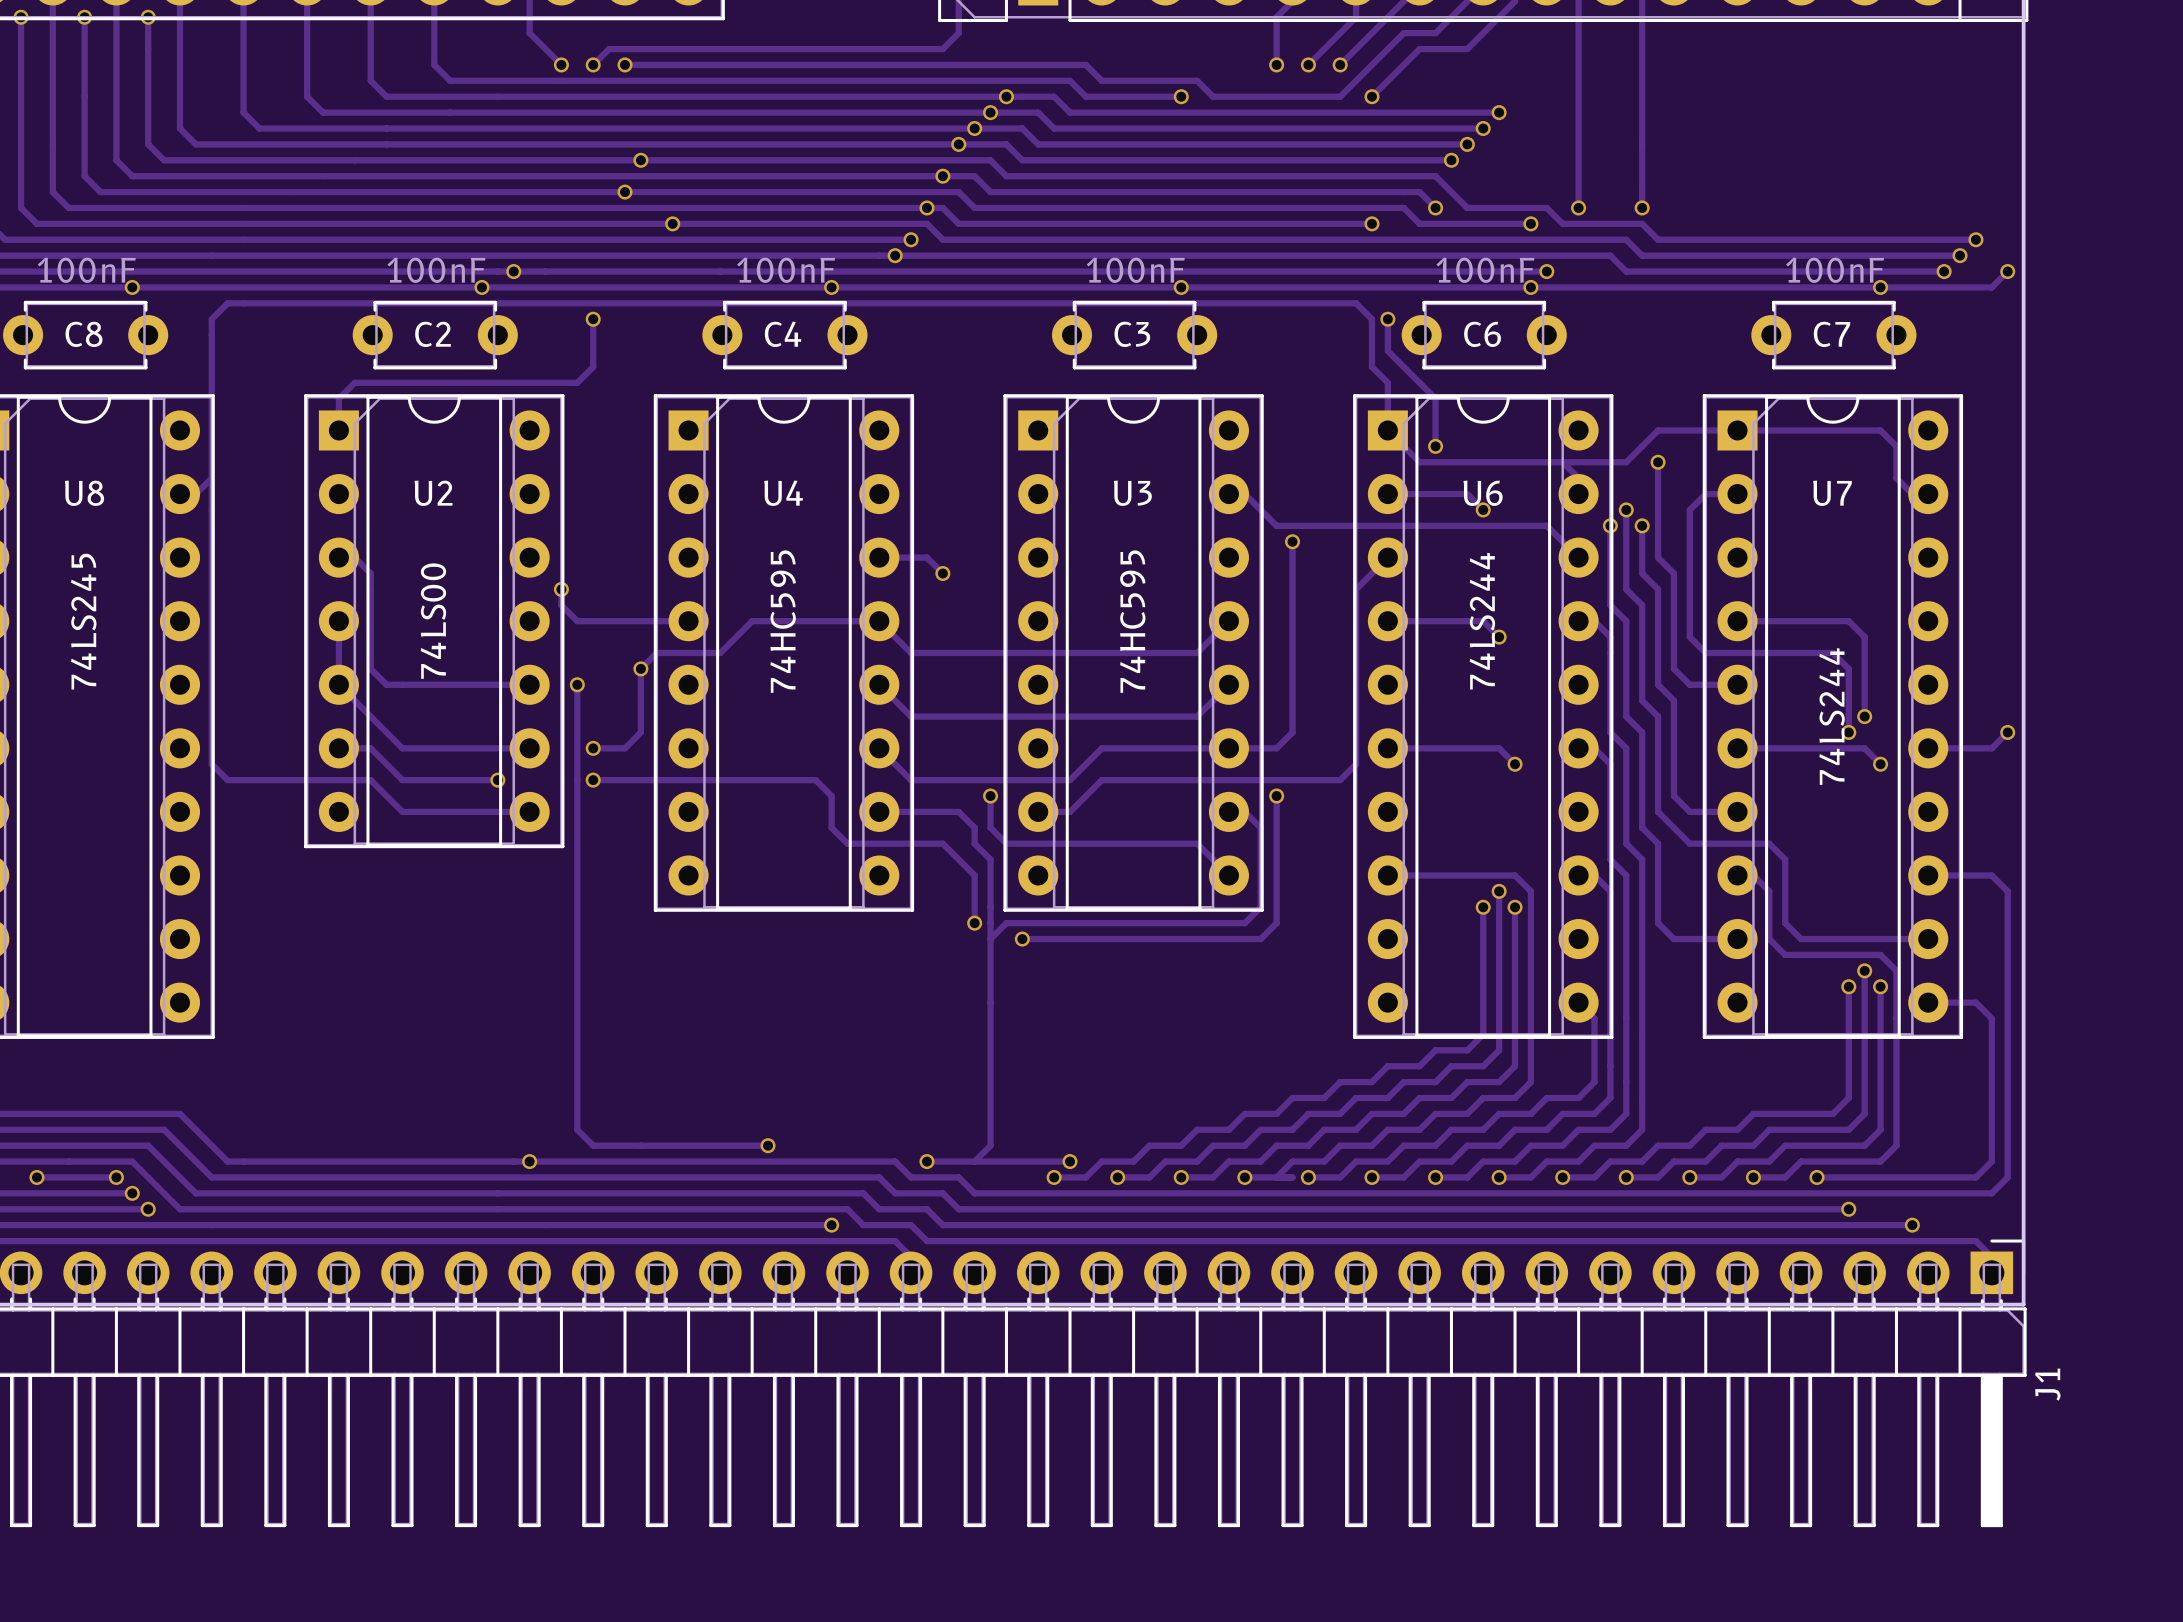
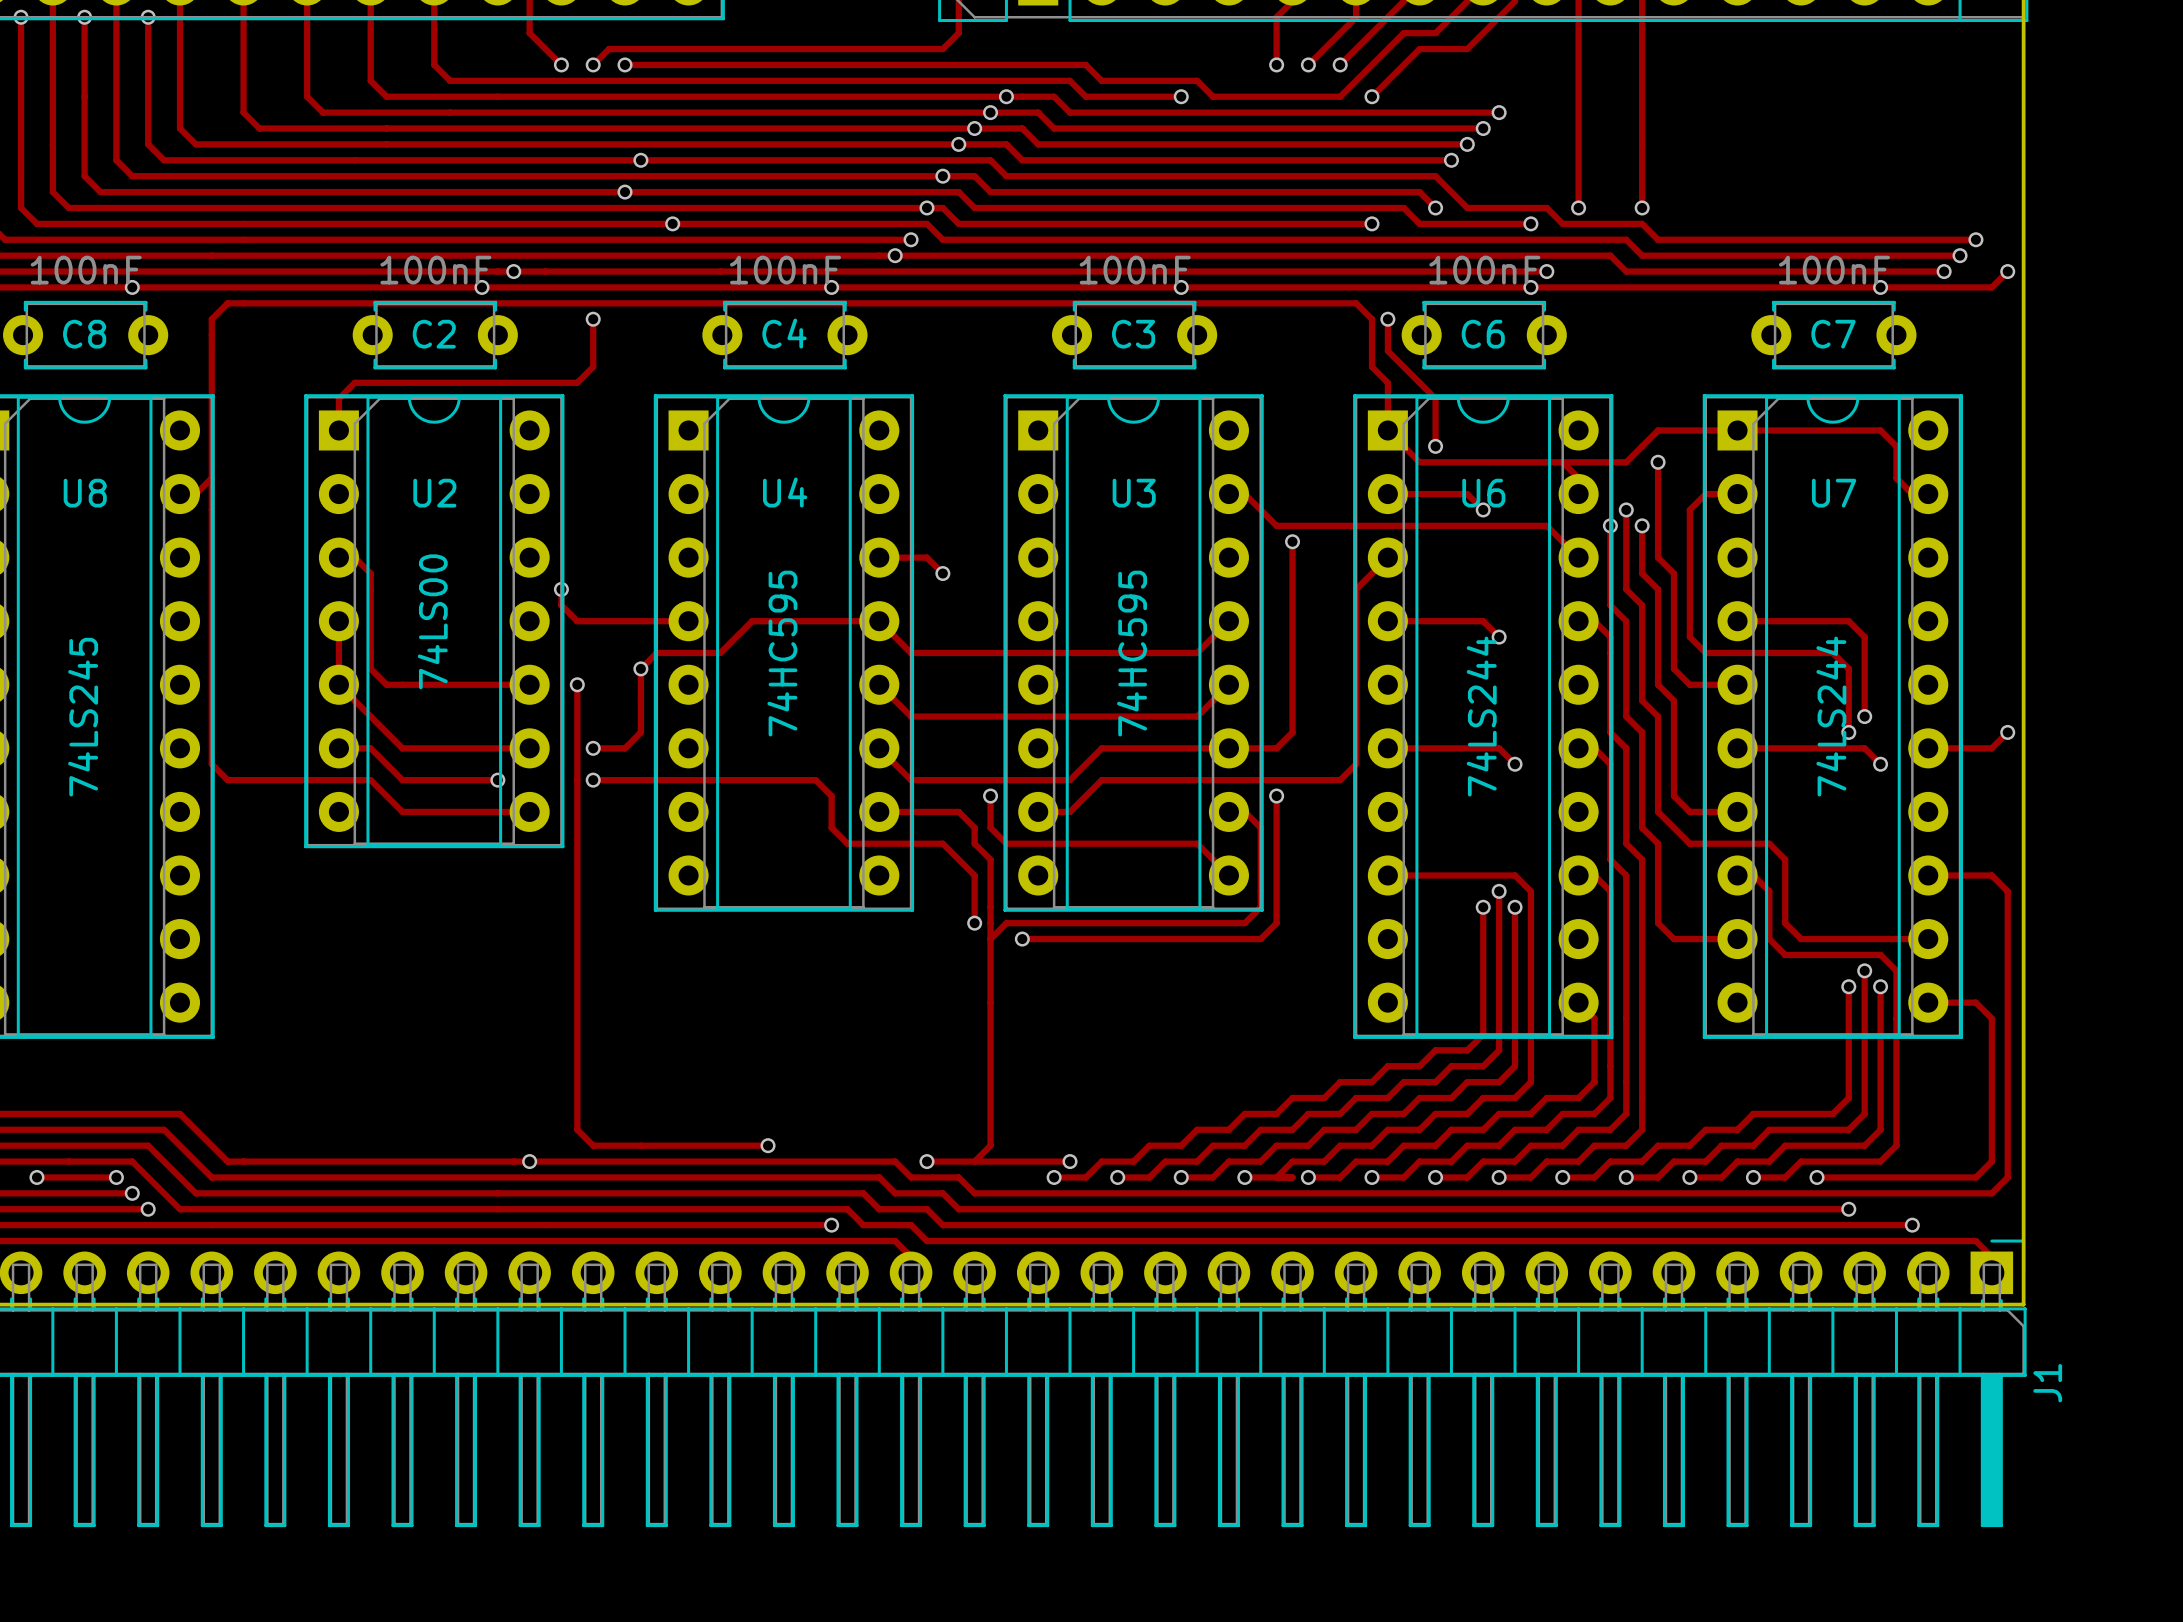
U8 value position: 74LS245 (83, 621) -> 74LS245 (83, 717)
U4 value position: 74HC595 (783, 621) -> 74HC595 (782, 653)
U3 value position: 74HC595 (1132, 621) -> 74HC595 (1132, 653)
U6 value position: 74LS244 (1482, 621) -> 74LS244 (1481, 716)

